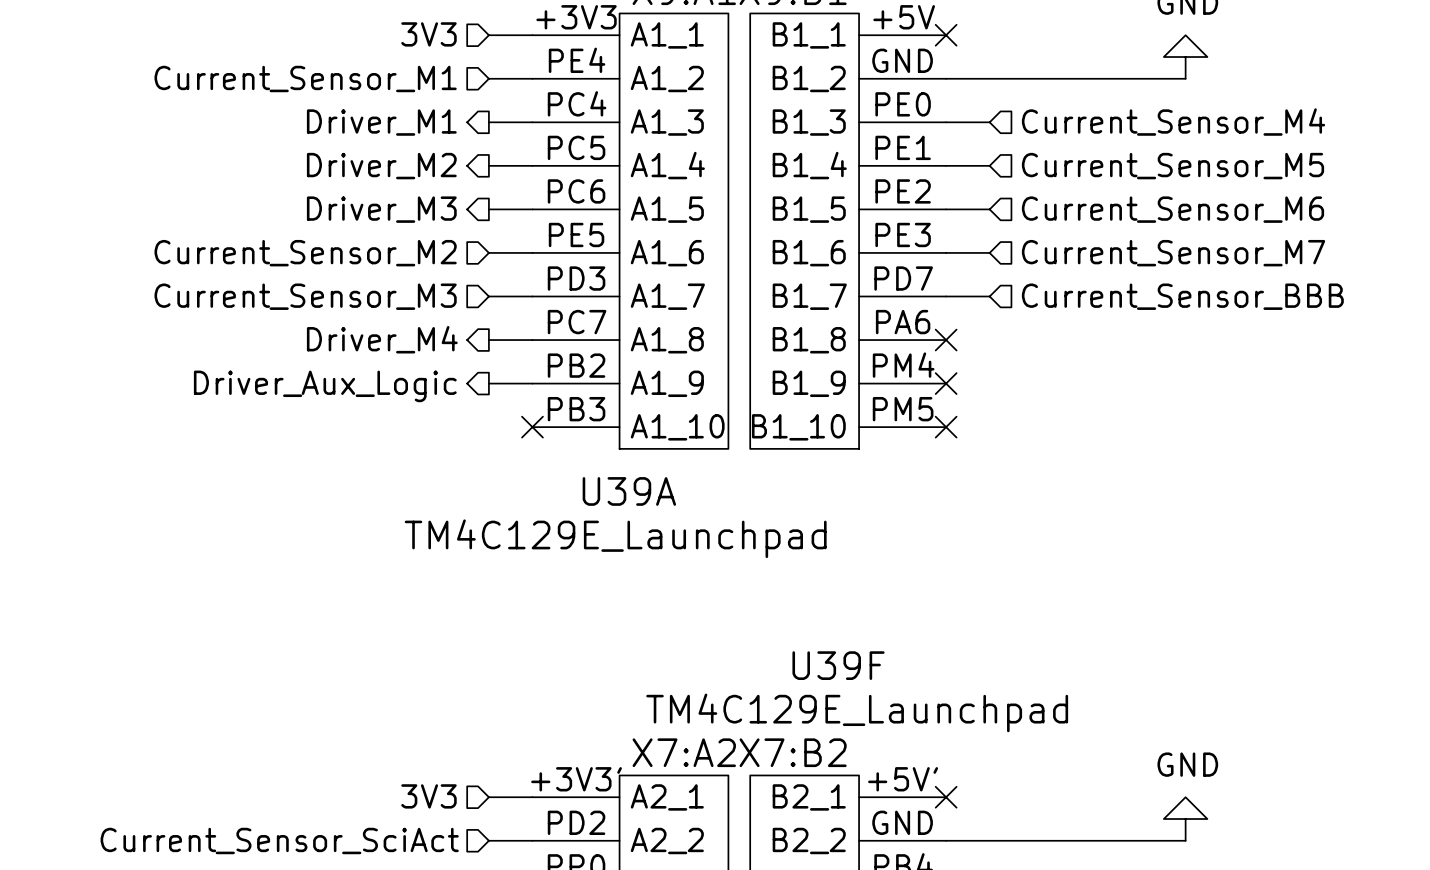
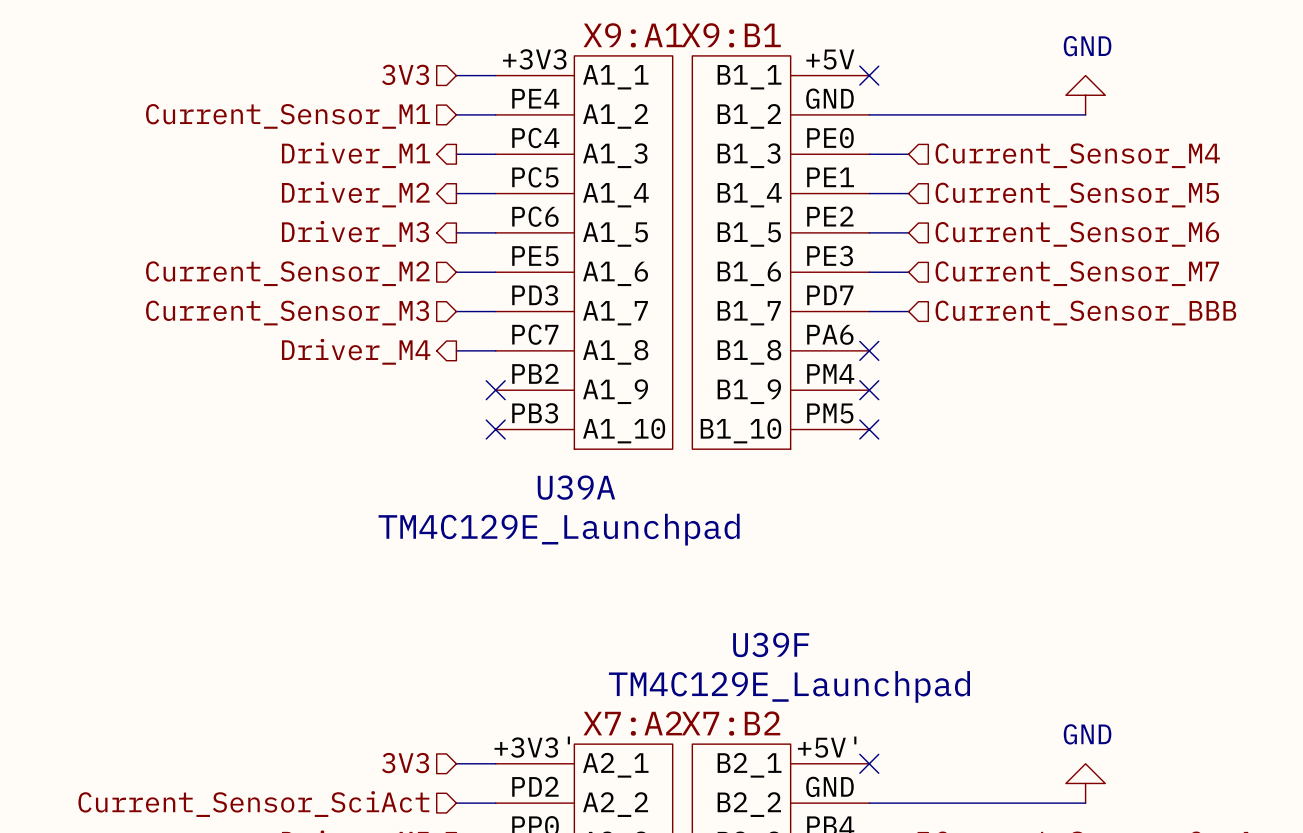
wire: (488, 383) (532, 383) -> none
no-connect mark: none -> (495, 390)
hierarchical label: Driver_Aux_Logic (325, 386) -> none

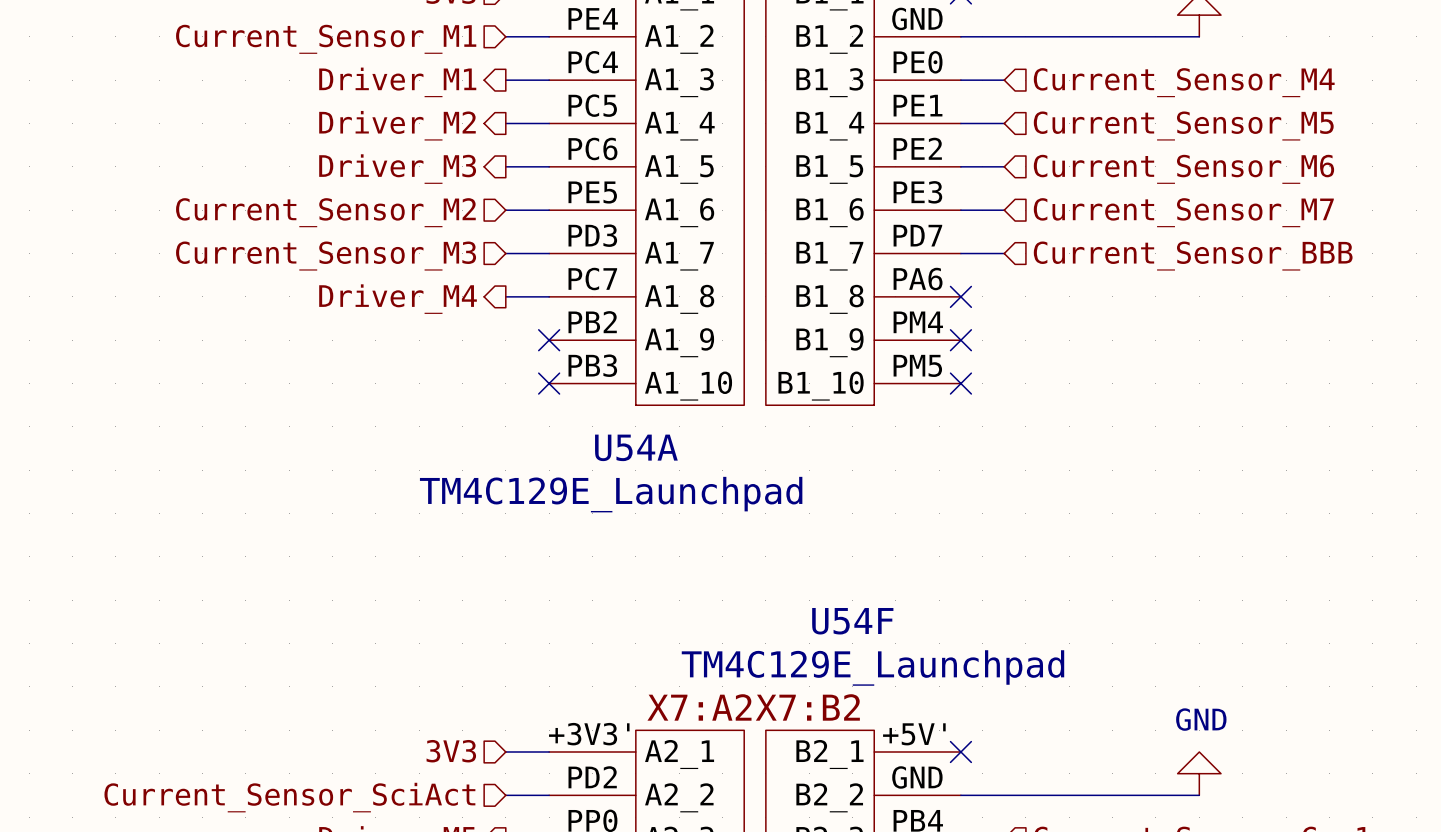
U39A name: U39A (576, 487) -> U54A (636, 447)
U39F name: U39F (771, 644) -> U54F (852, 621)

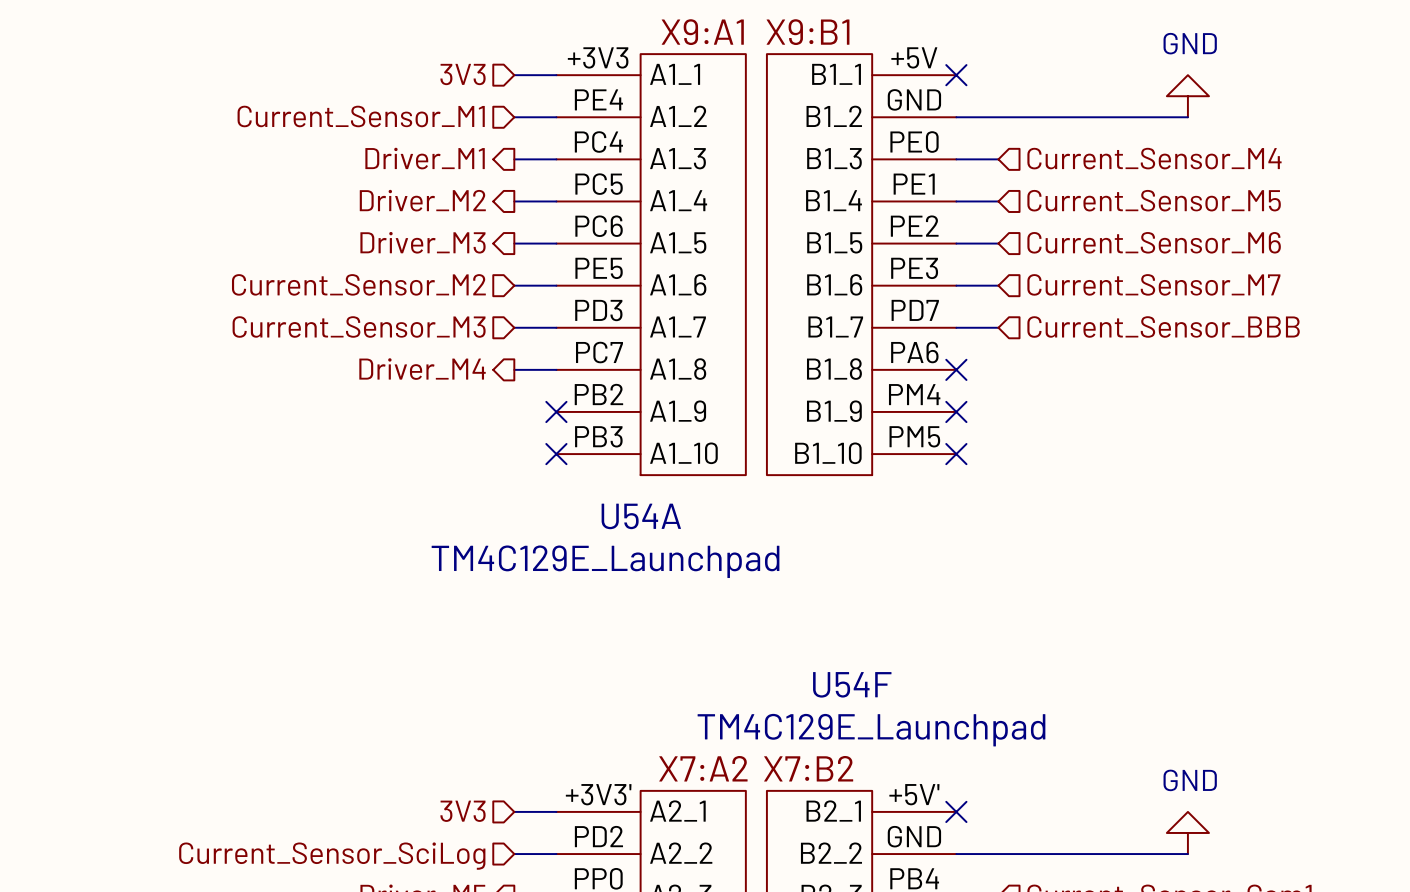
hierarchical label: Current_Sensor_SciAct (289, 797) -> Current_Sensor_SciLog (332, 856)

